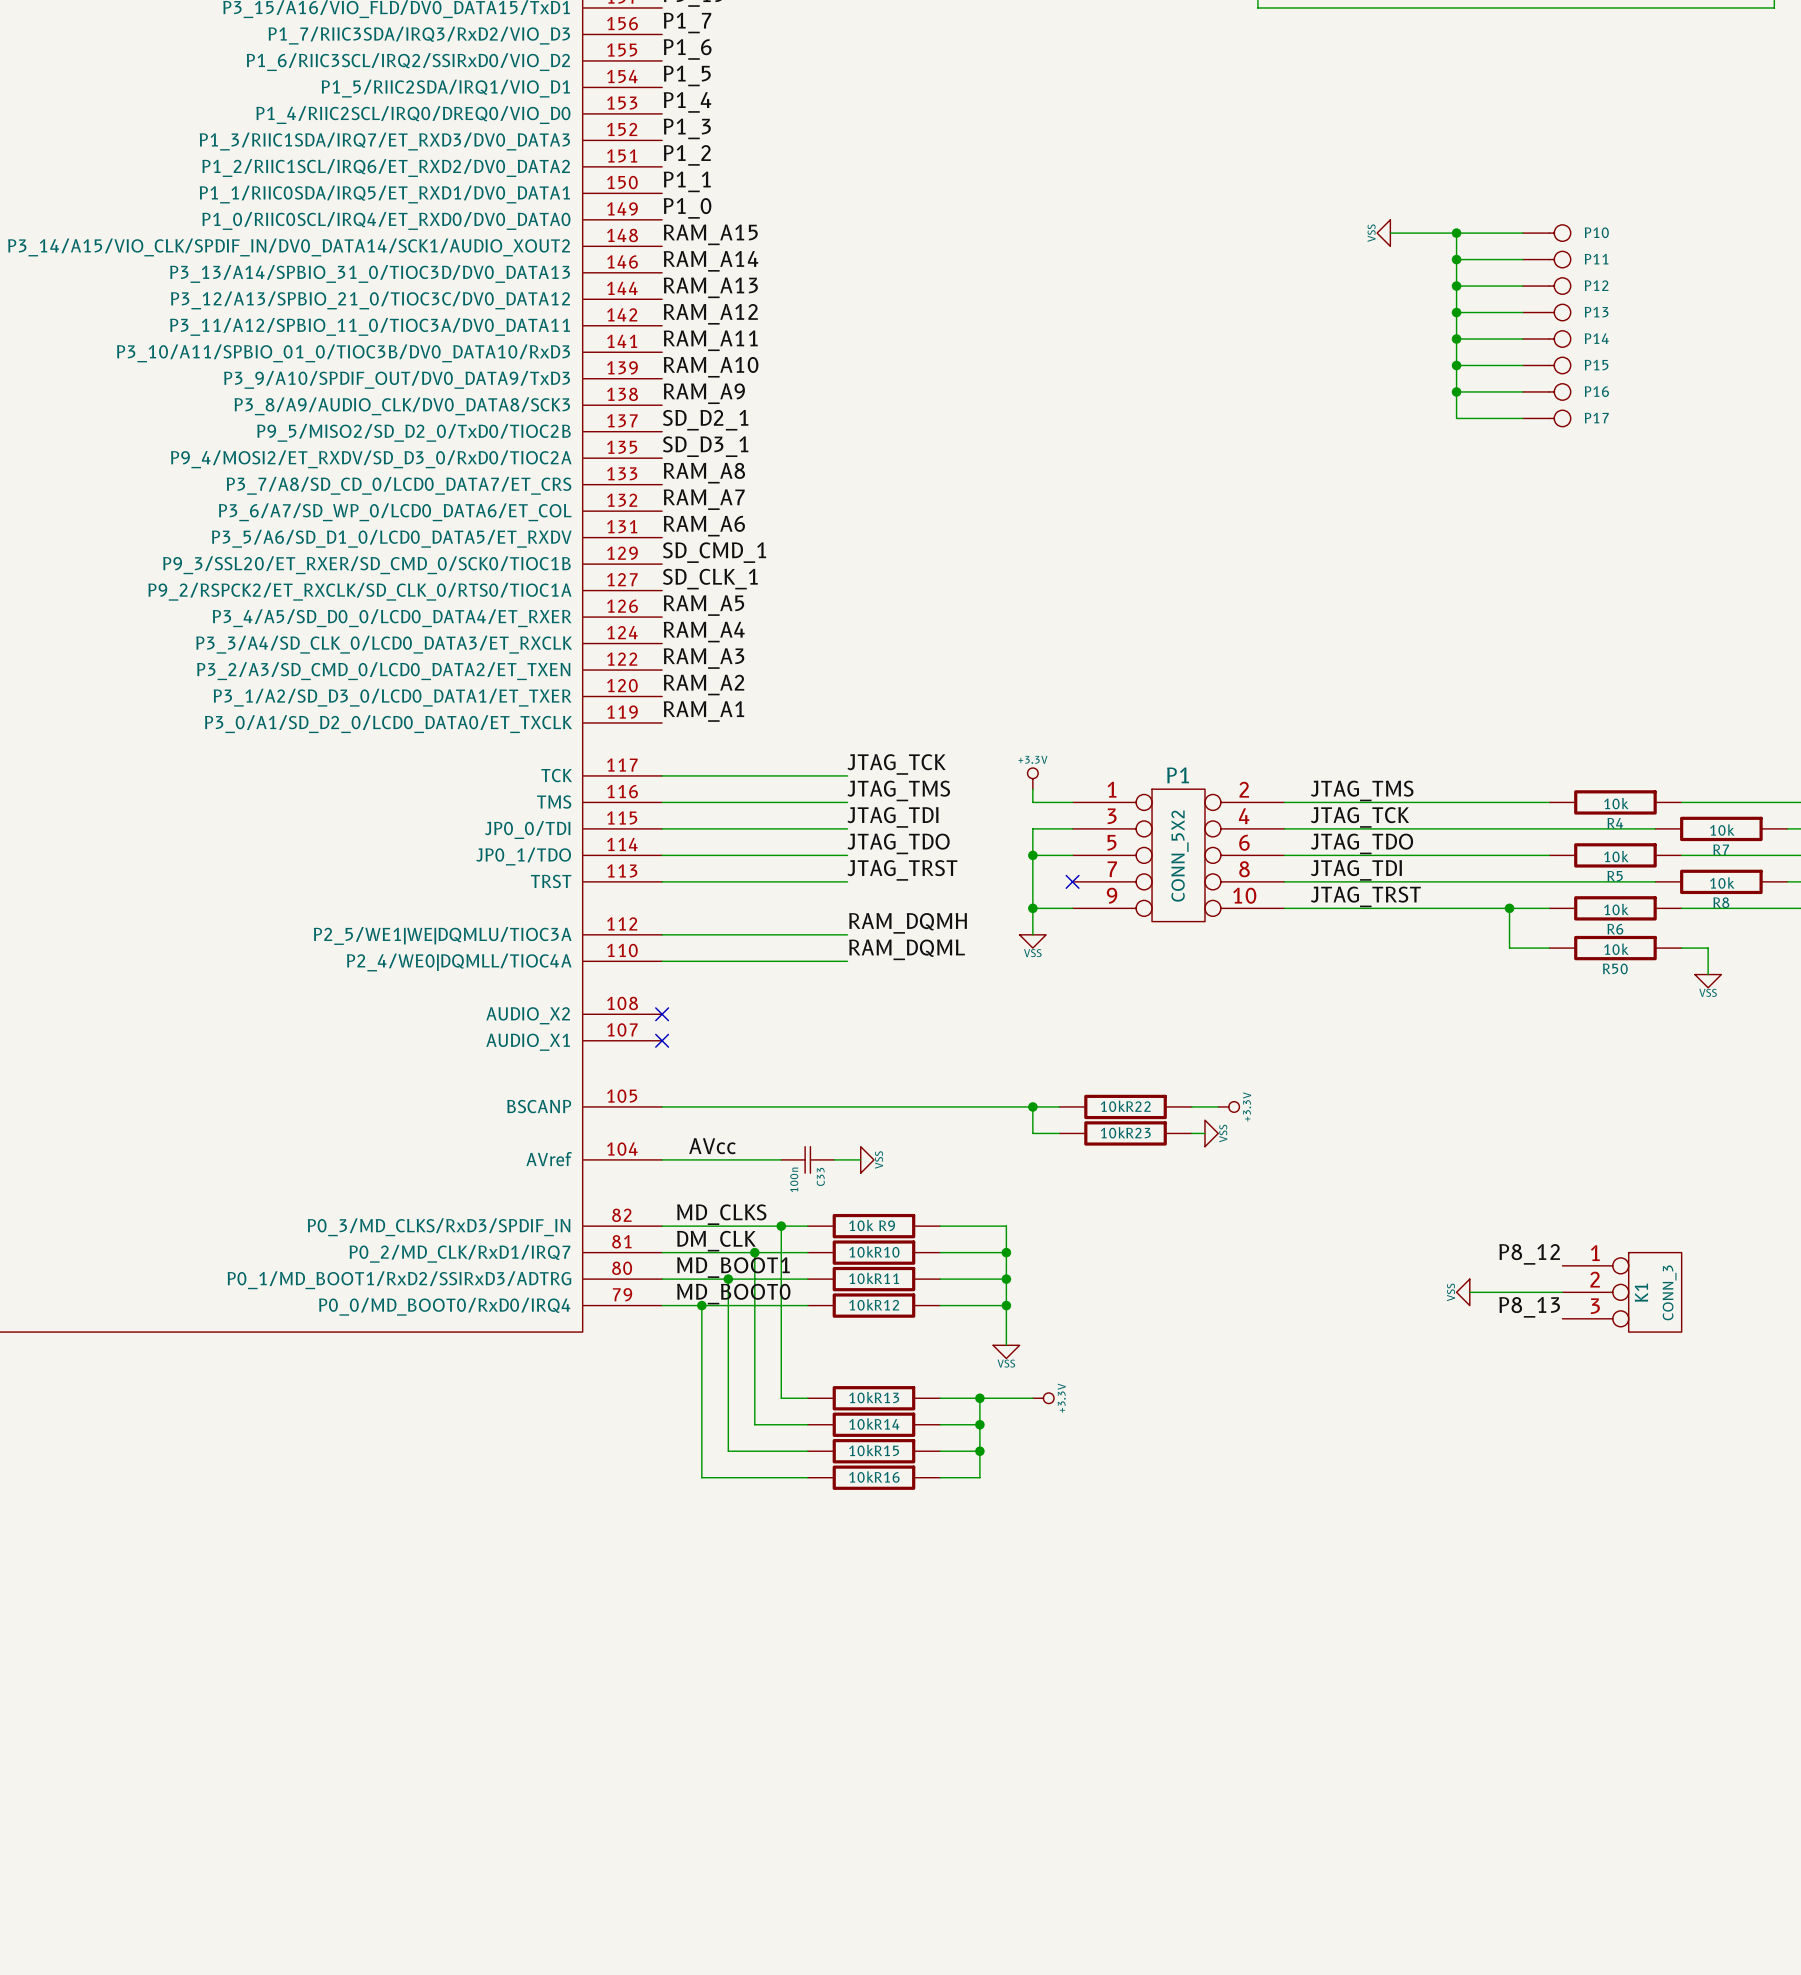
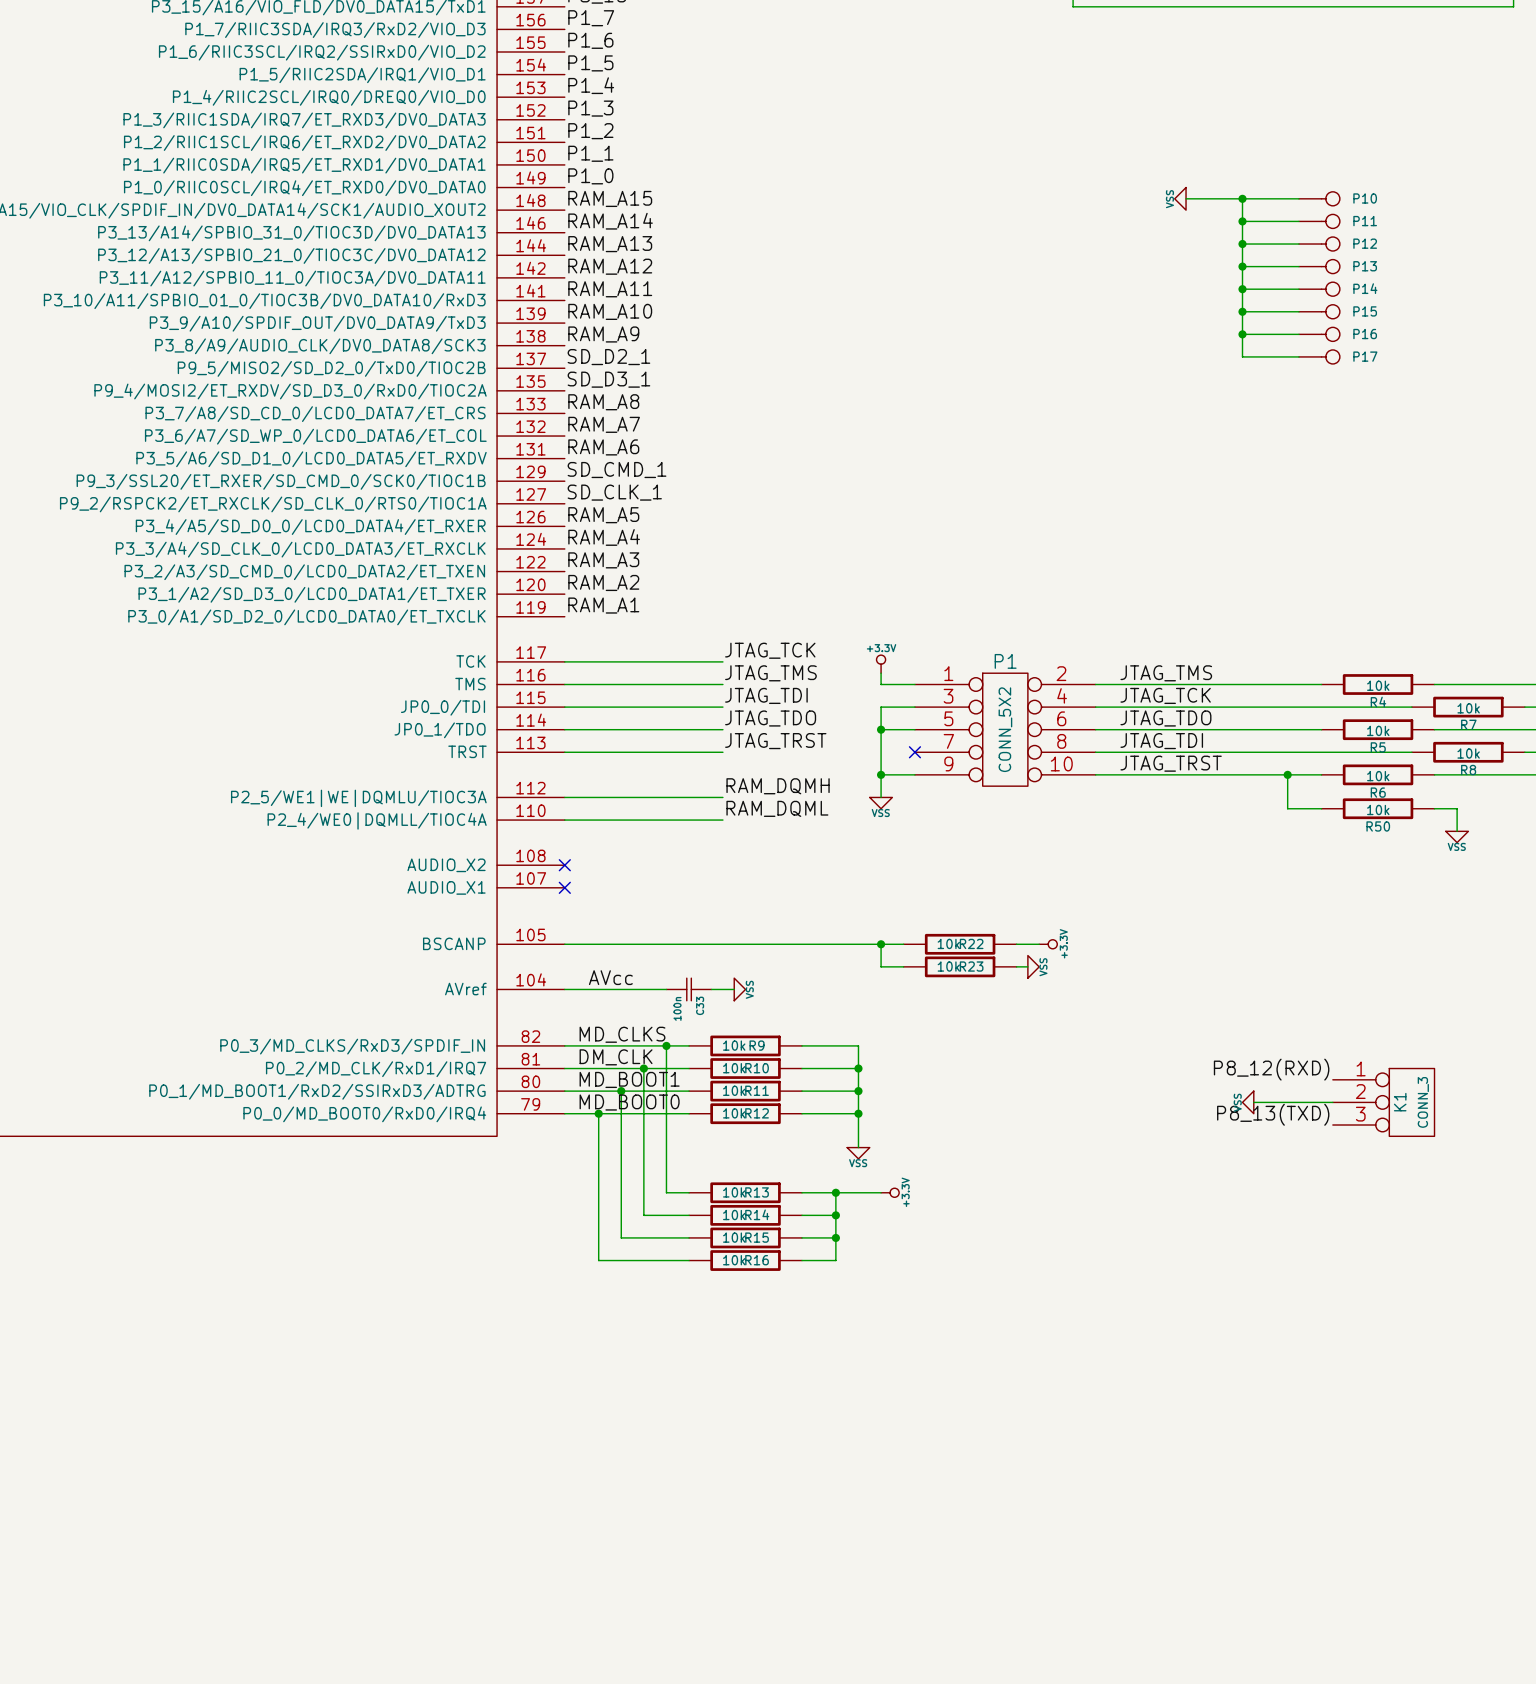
label: P8_12 (1529, 1254) -> P8_12(RXD) (1271, 1069)
label: P8_13 (1529, 1307) -> P8_13(TXD) (1273, 1114)

